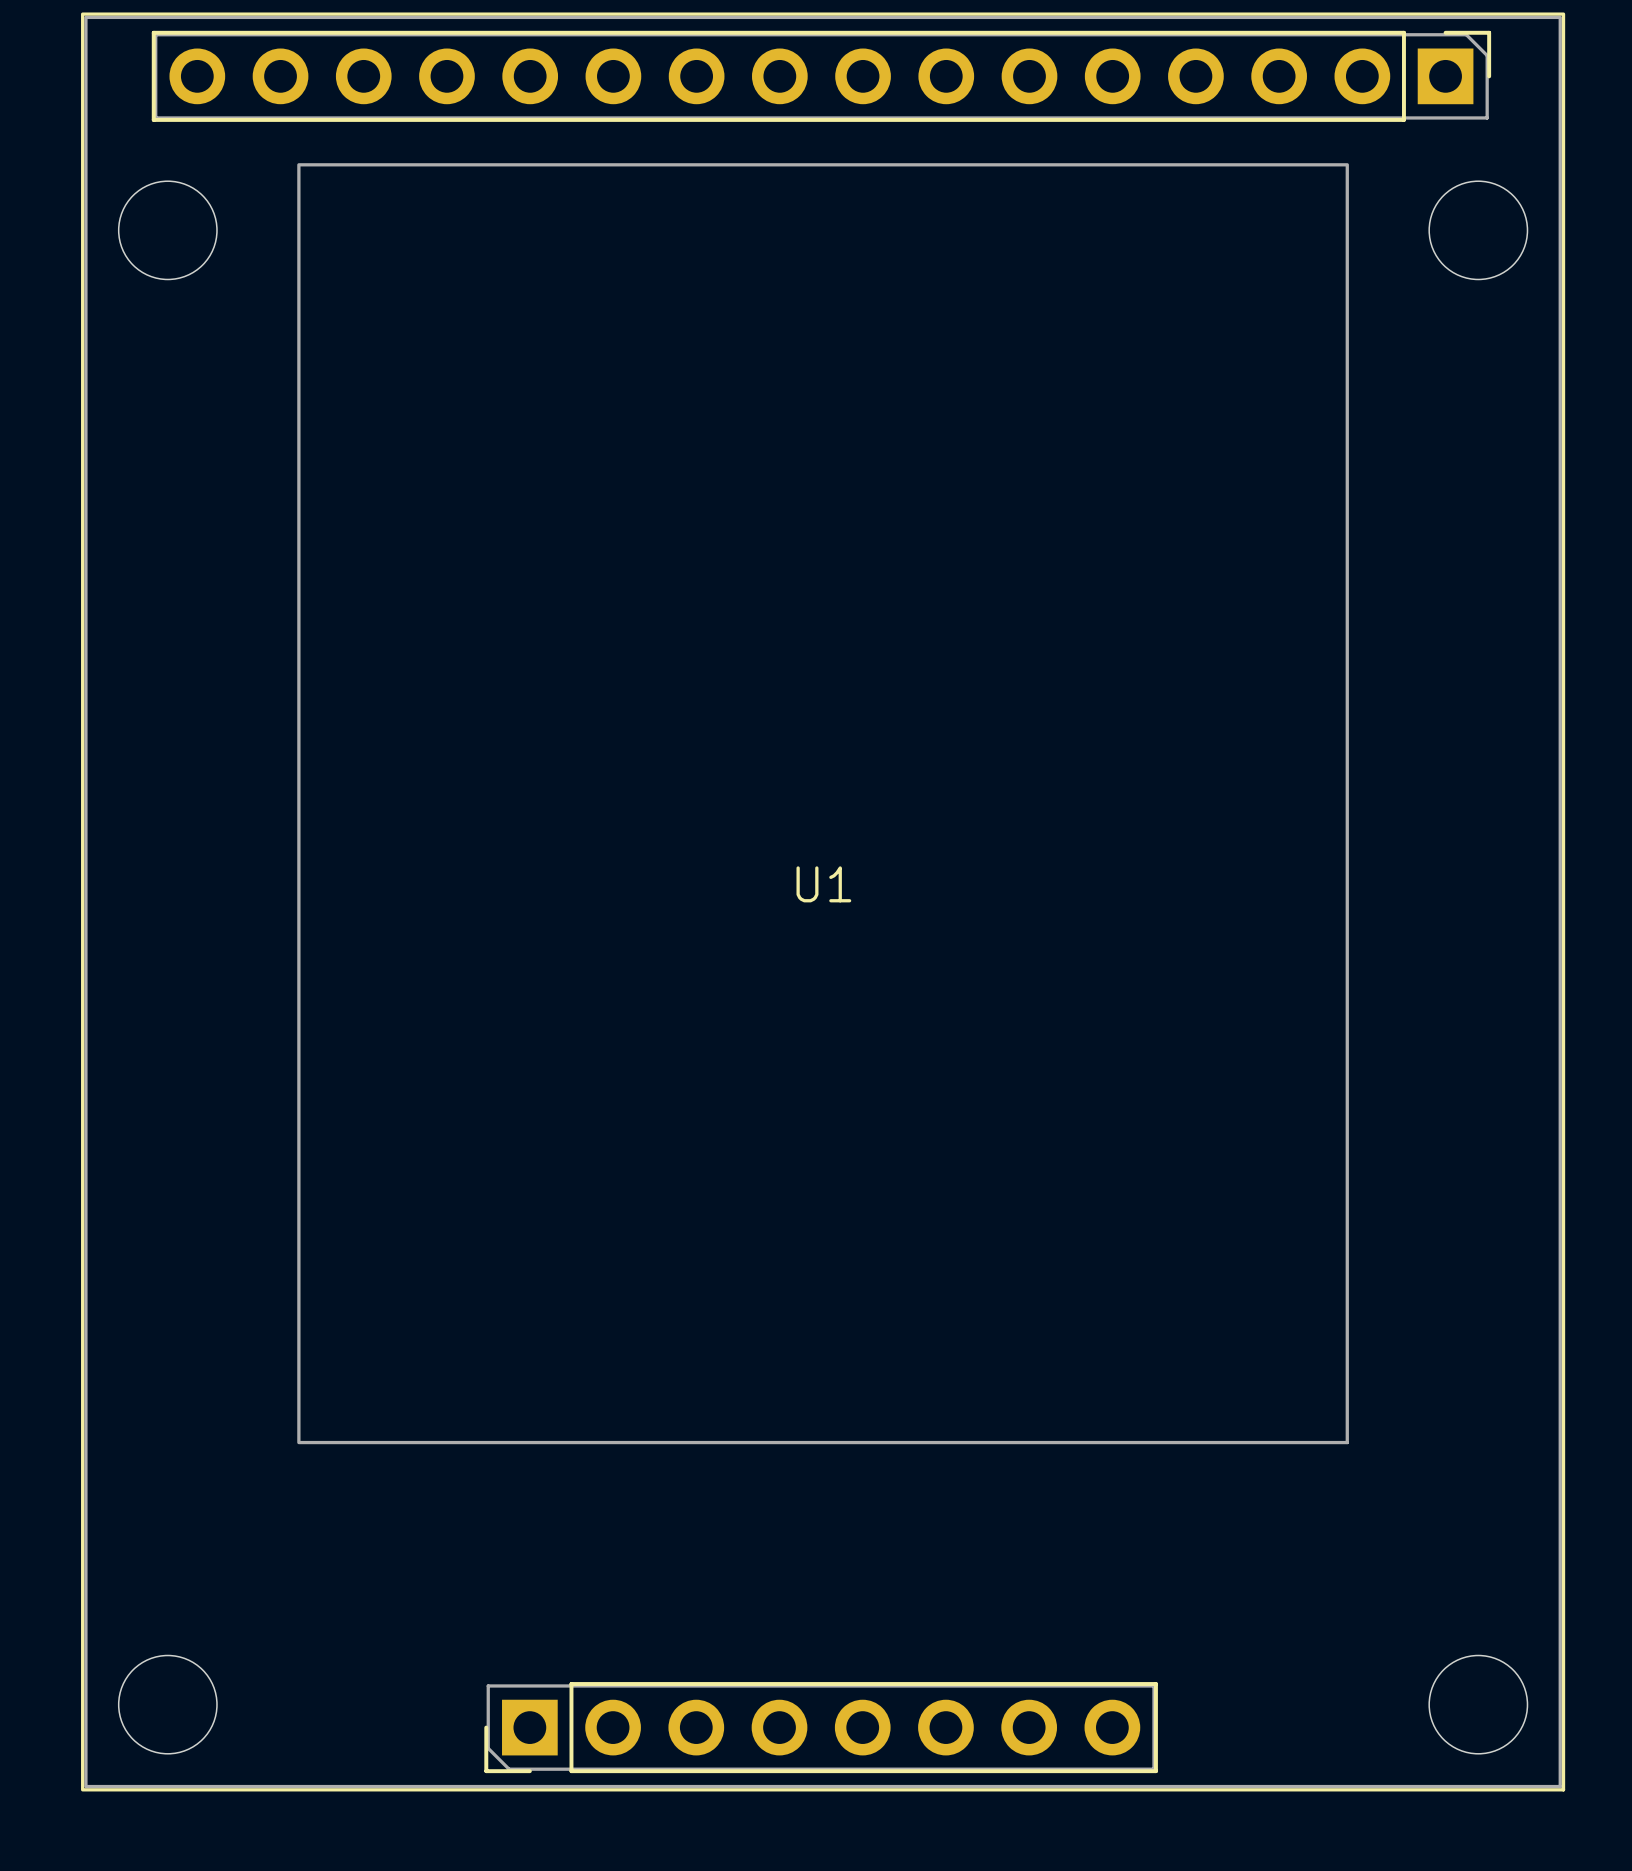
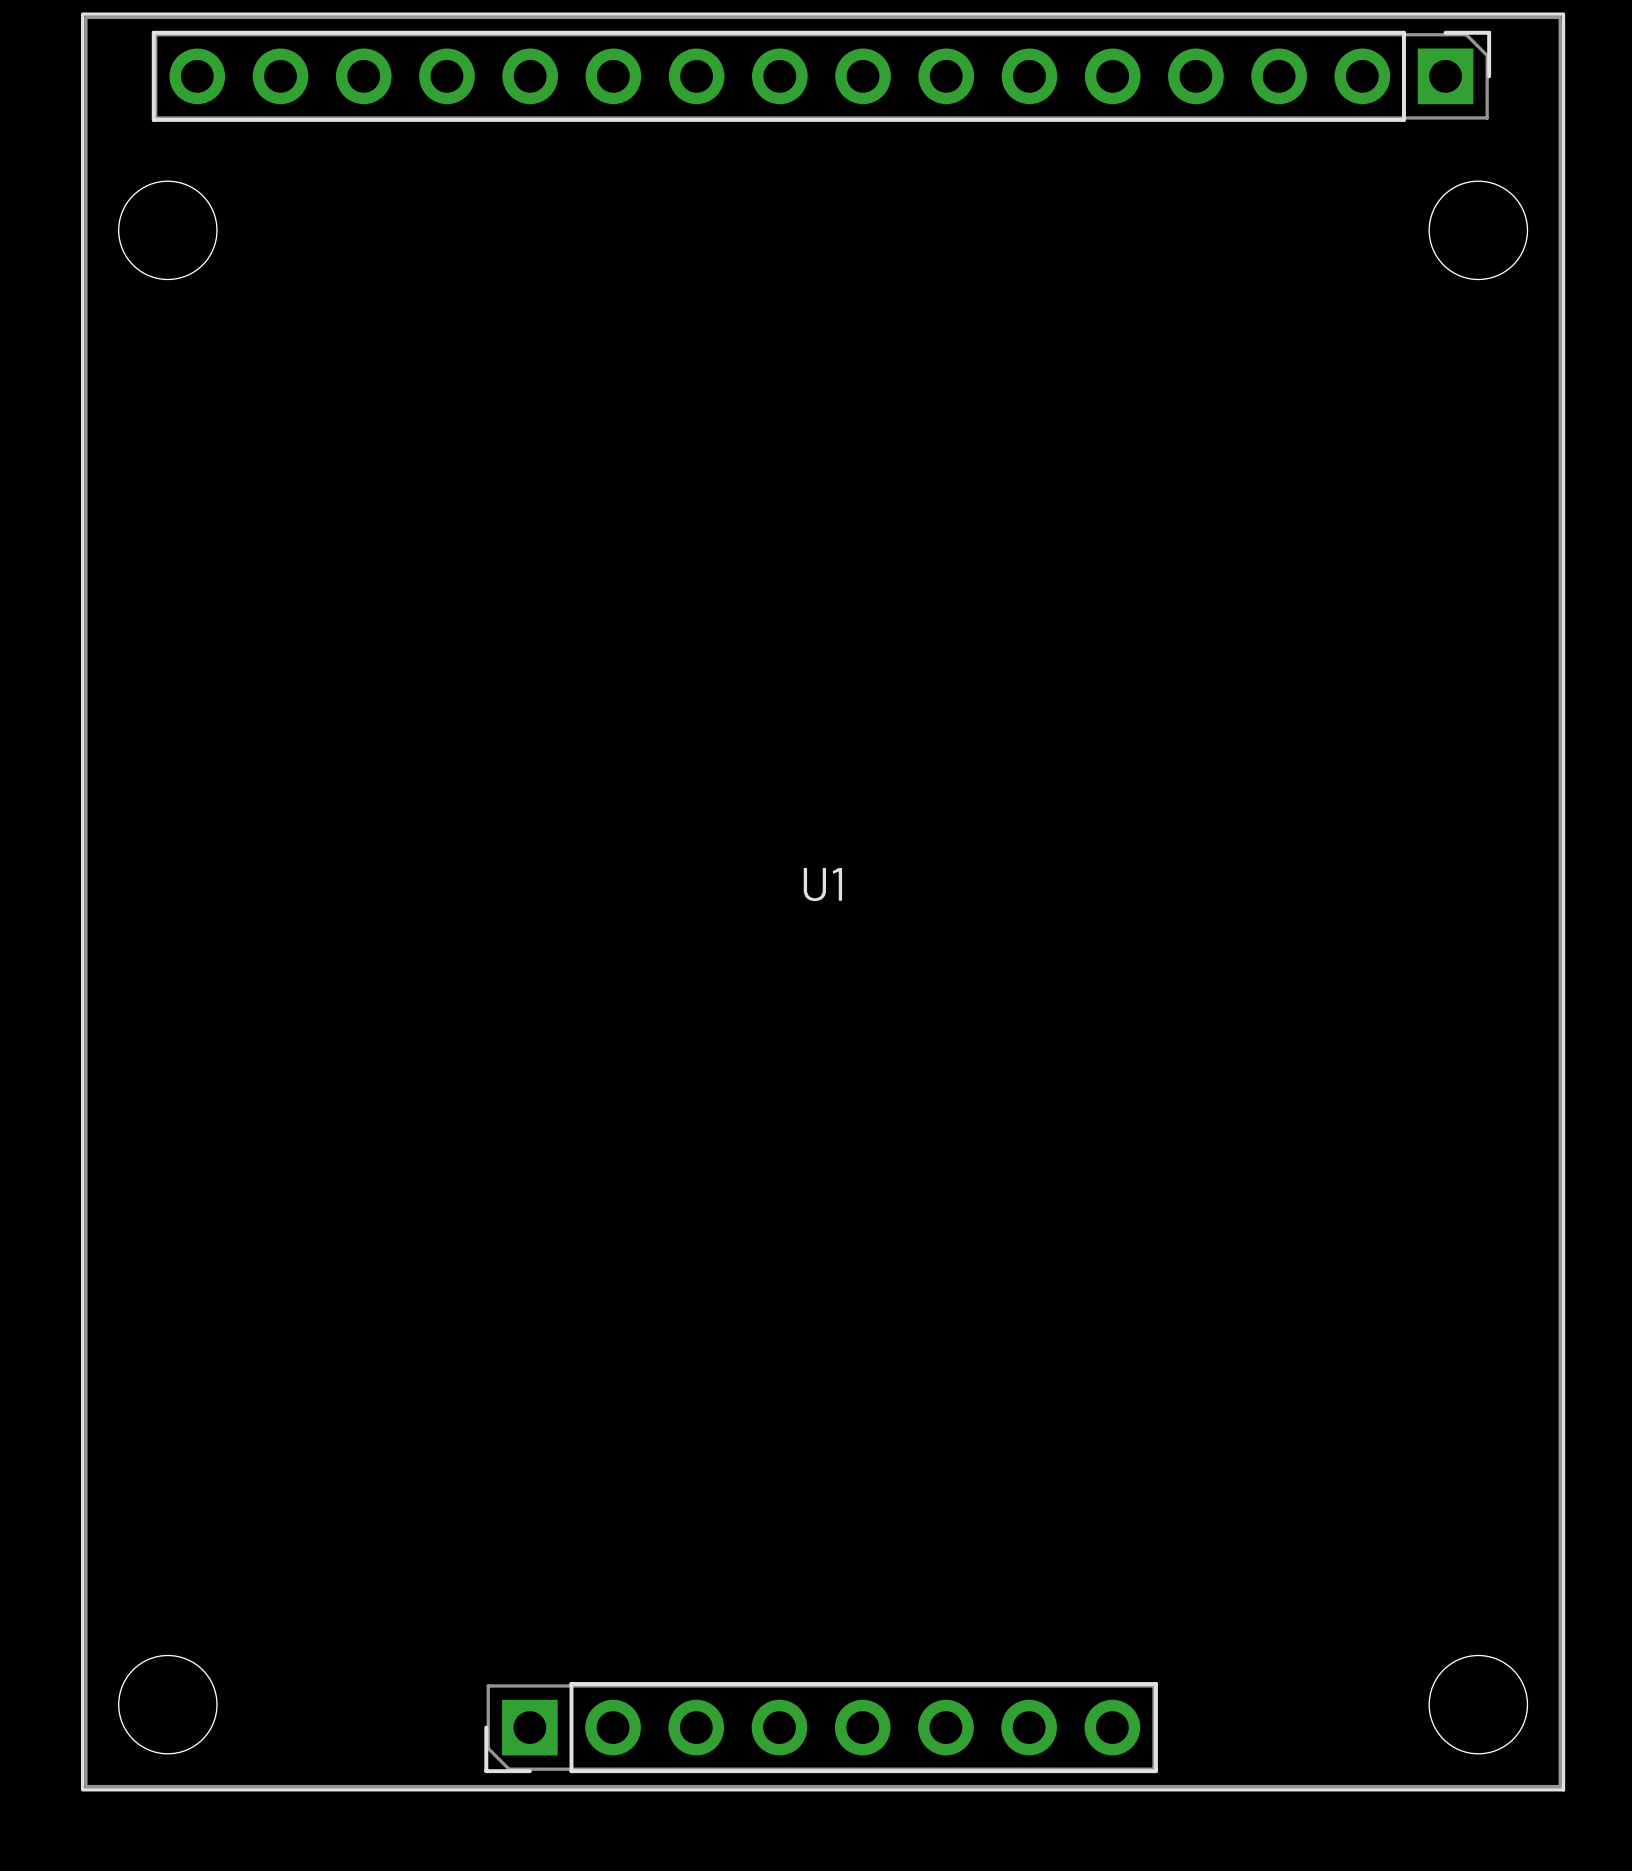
U1 footprint: [81, 12, 1566, 1792] -> [81, 12, 1566, 1792]

